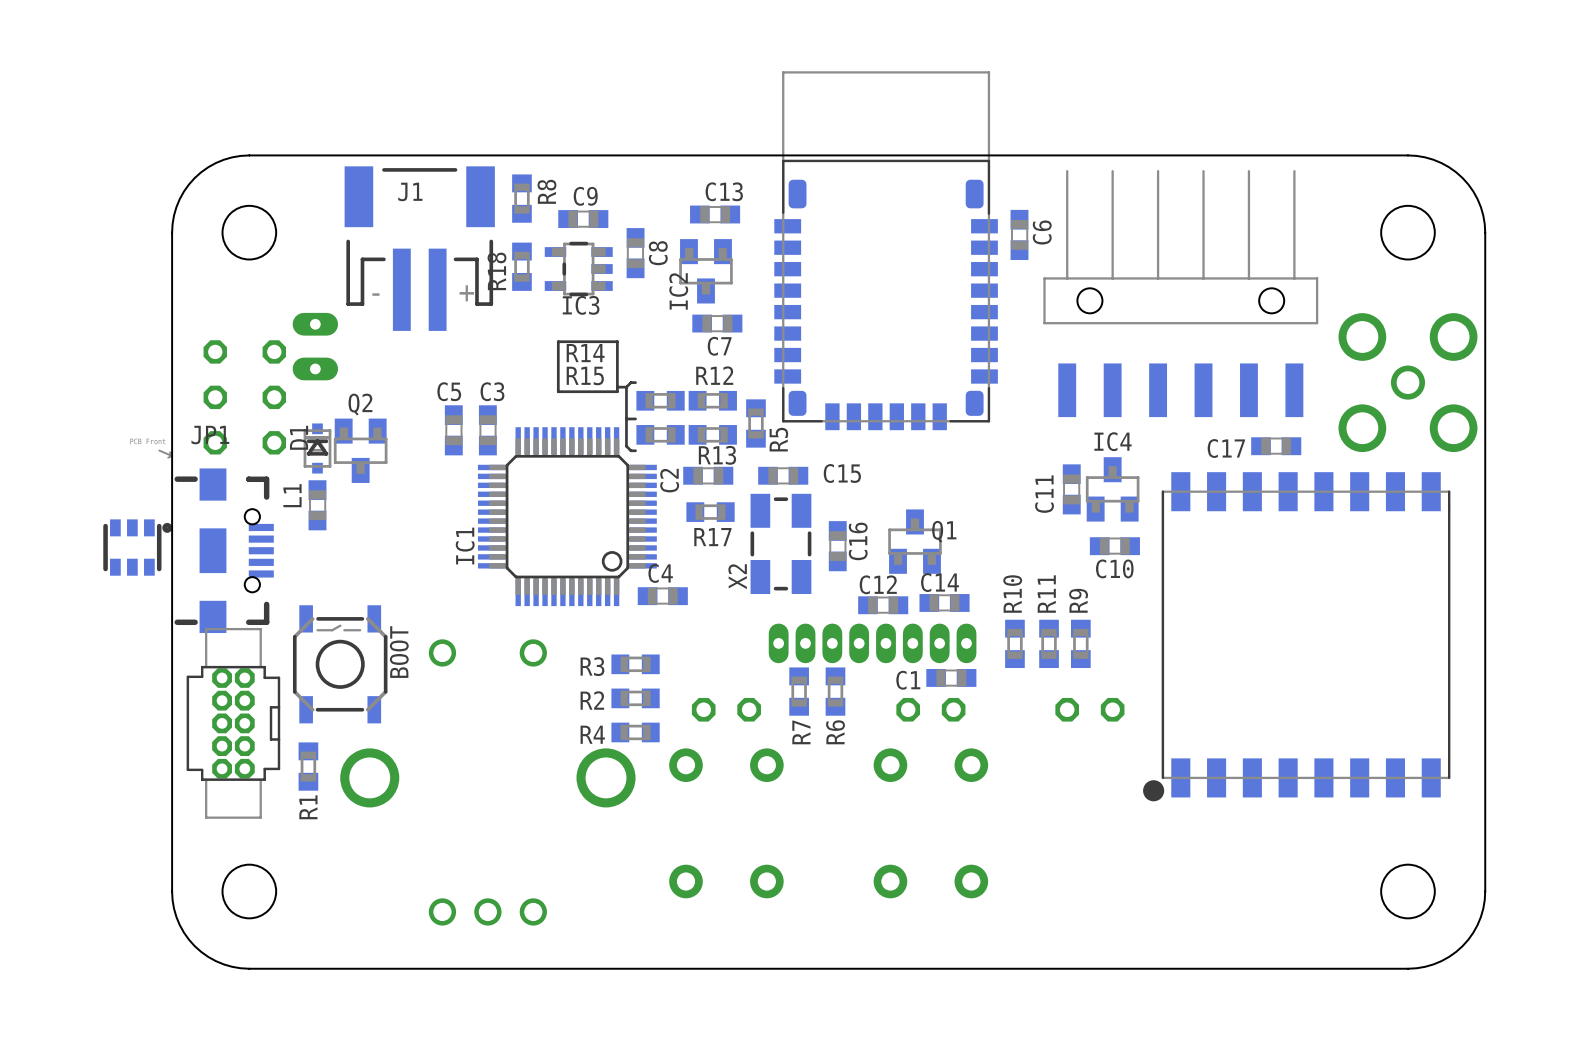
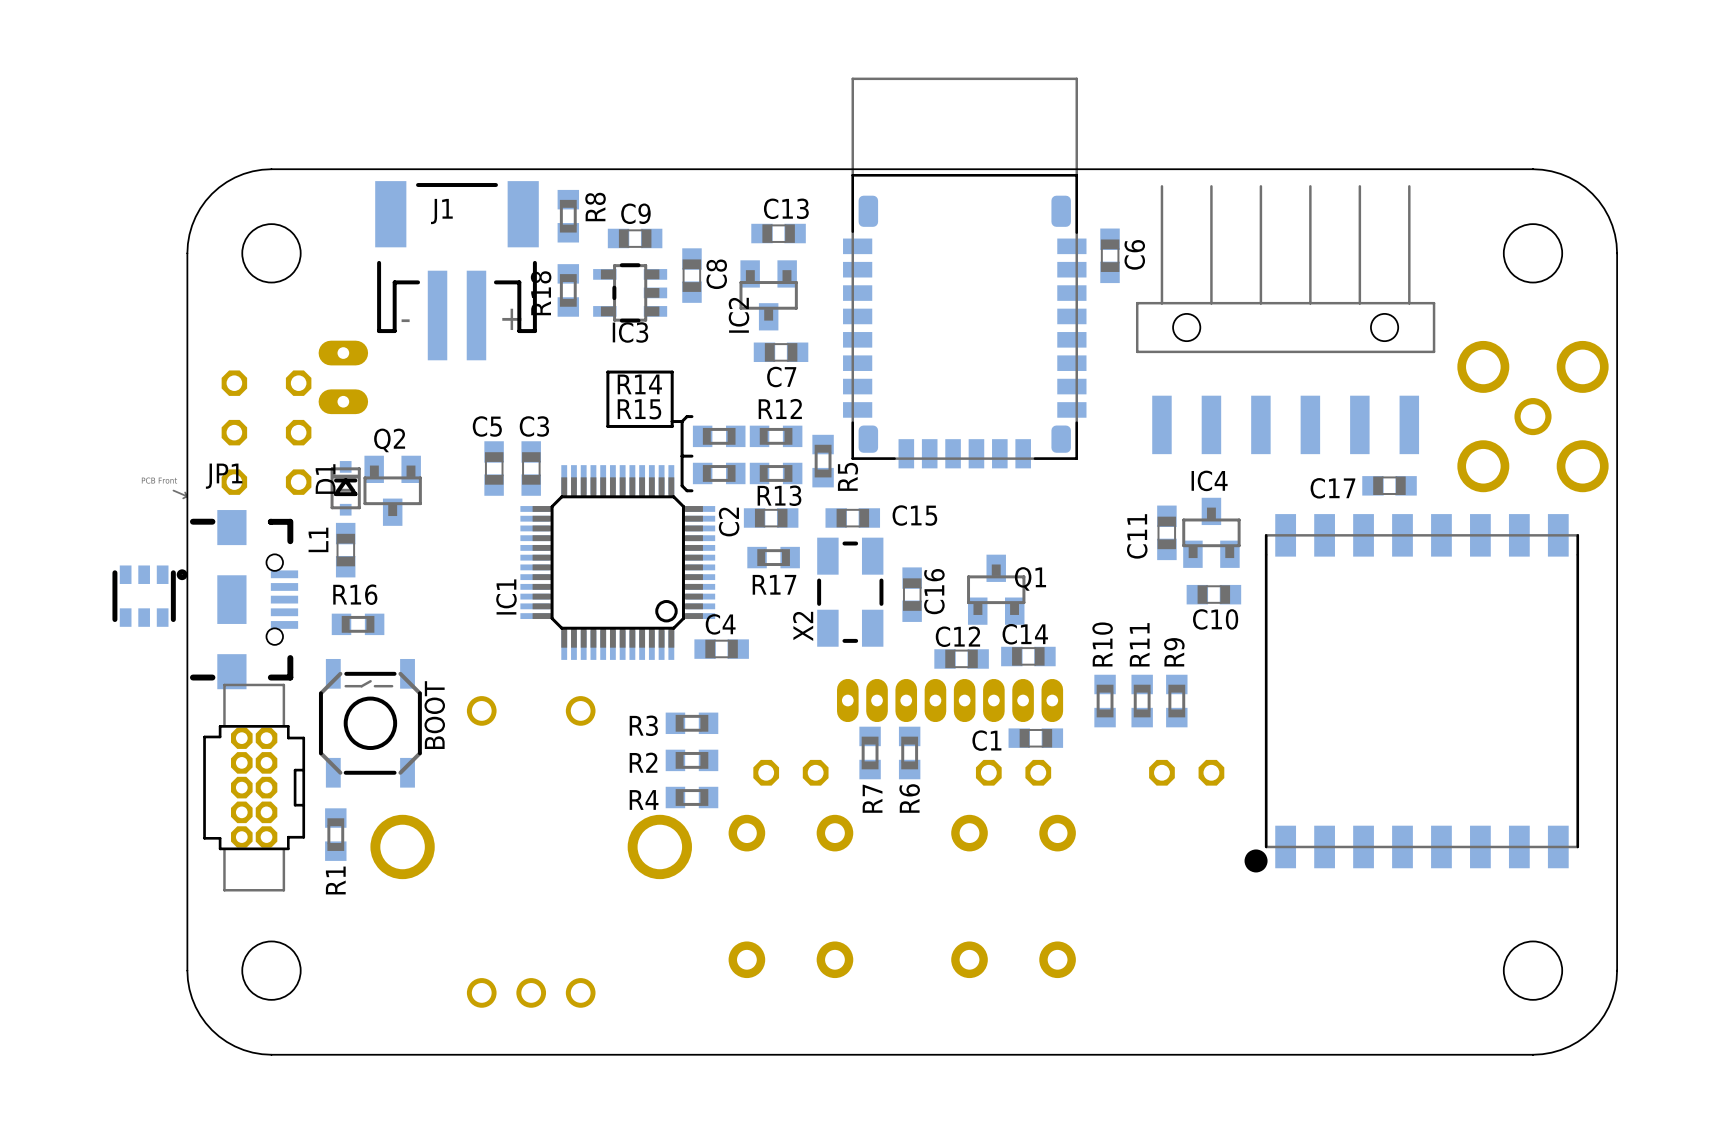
R16: none -> (358, 624)

